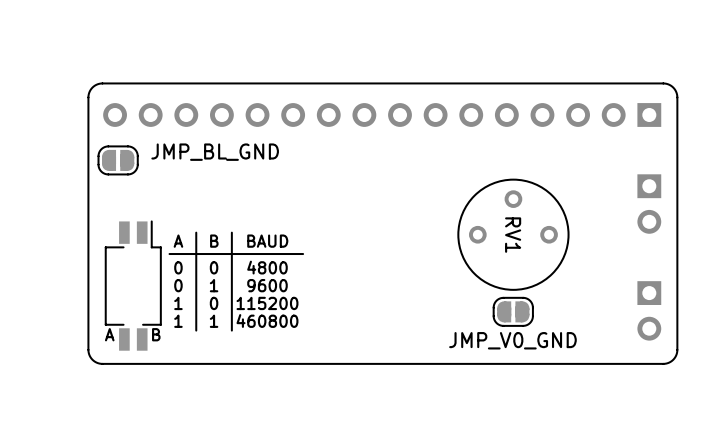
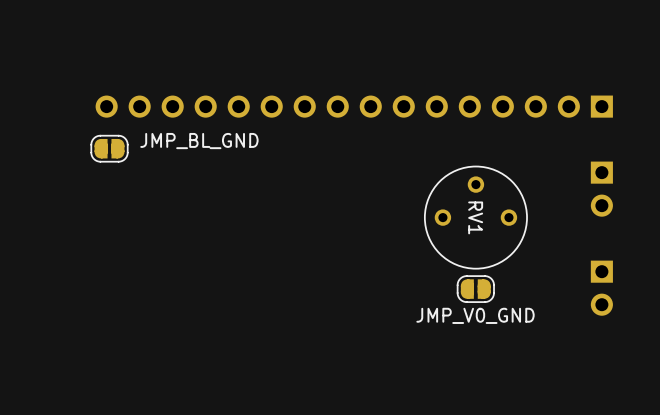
board edge: (663, 83) (96, 84) (90, 90) (88, 97) (89, 355) (94, 361) (102, 363) (669, 362) (675, 357) (677, 349) (677, 97) (673, 87) (663, 83) -> none
line: (196, 232) (196, 330) -> none
line: (231, 232) (231, 330) -> none
text: A (178, 241) -> none
text: B (214, 241) -> none
text: BAUD (267, 241) -> none
line: (303, 254) (169, 254) -> none
text: 0 (178, 267) -> none
text: 0 (214, 267) -> none
text: 4800 (267, 267) -> none
part: (133, 285) -> none
text: 0 (178, 285) -> none
text: 1 (214, 285) -> none
text: 9600 (267, 285) -> none
text: 1 (178, 303) -> none
text: 0 (214, 303) -> none
text: 115200 (267, 303) -> none
text: 1 (178, 321) -> none
text: 1 (214, 321) -> none
text: 460800 (267, 321) -> none
text: A (109, 334) -> none
text: B (156, 334) -> none

